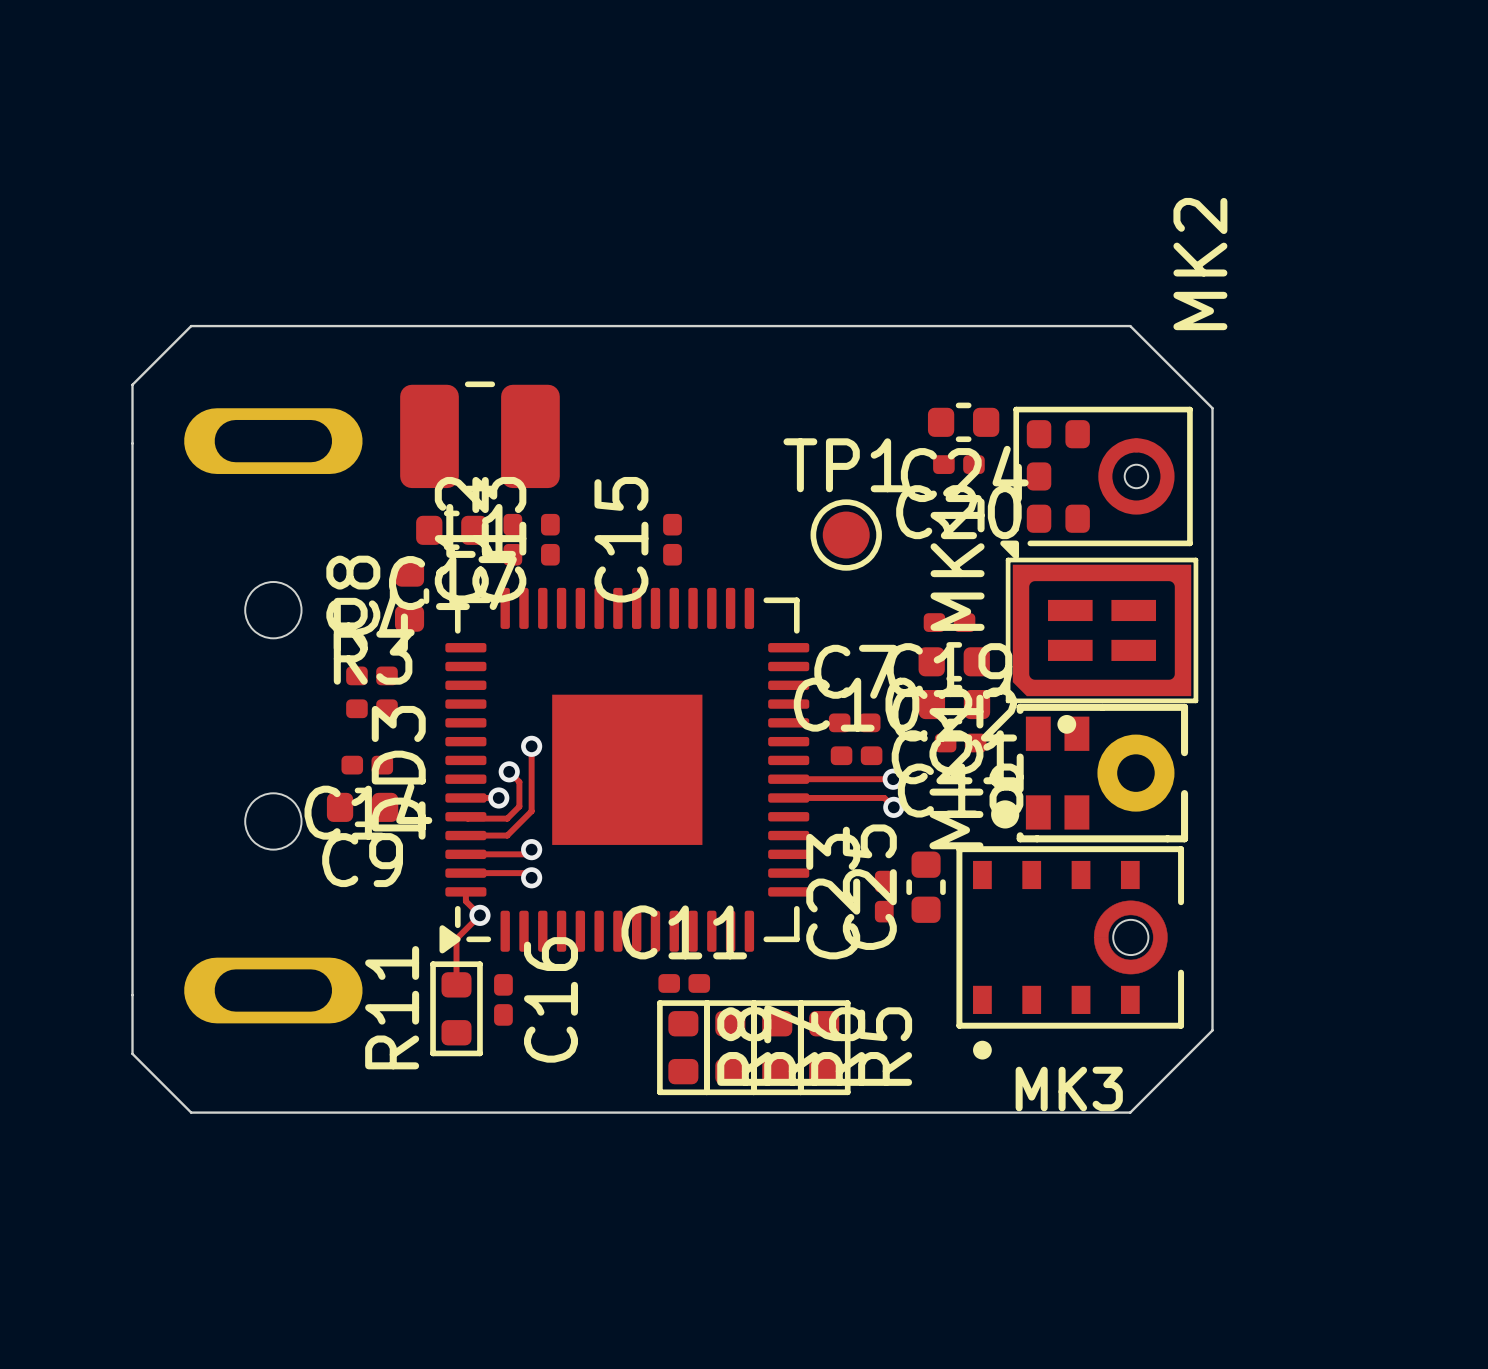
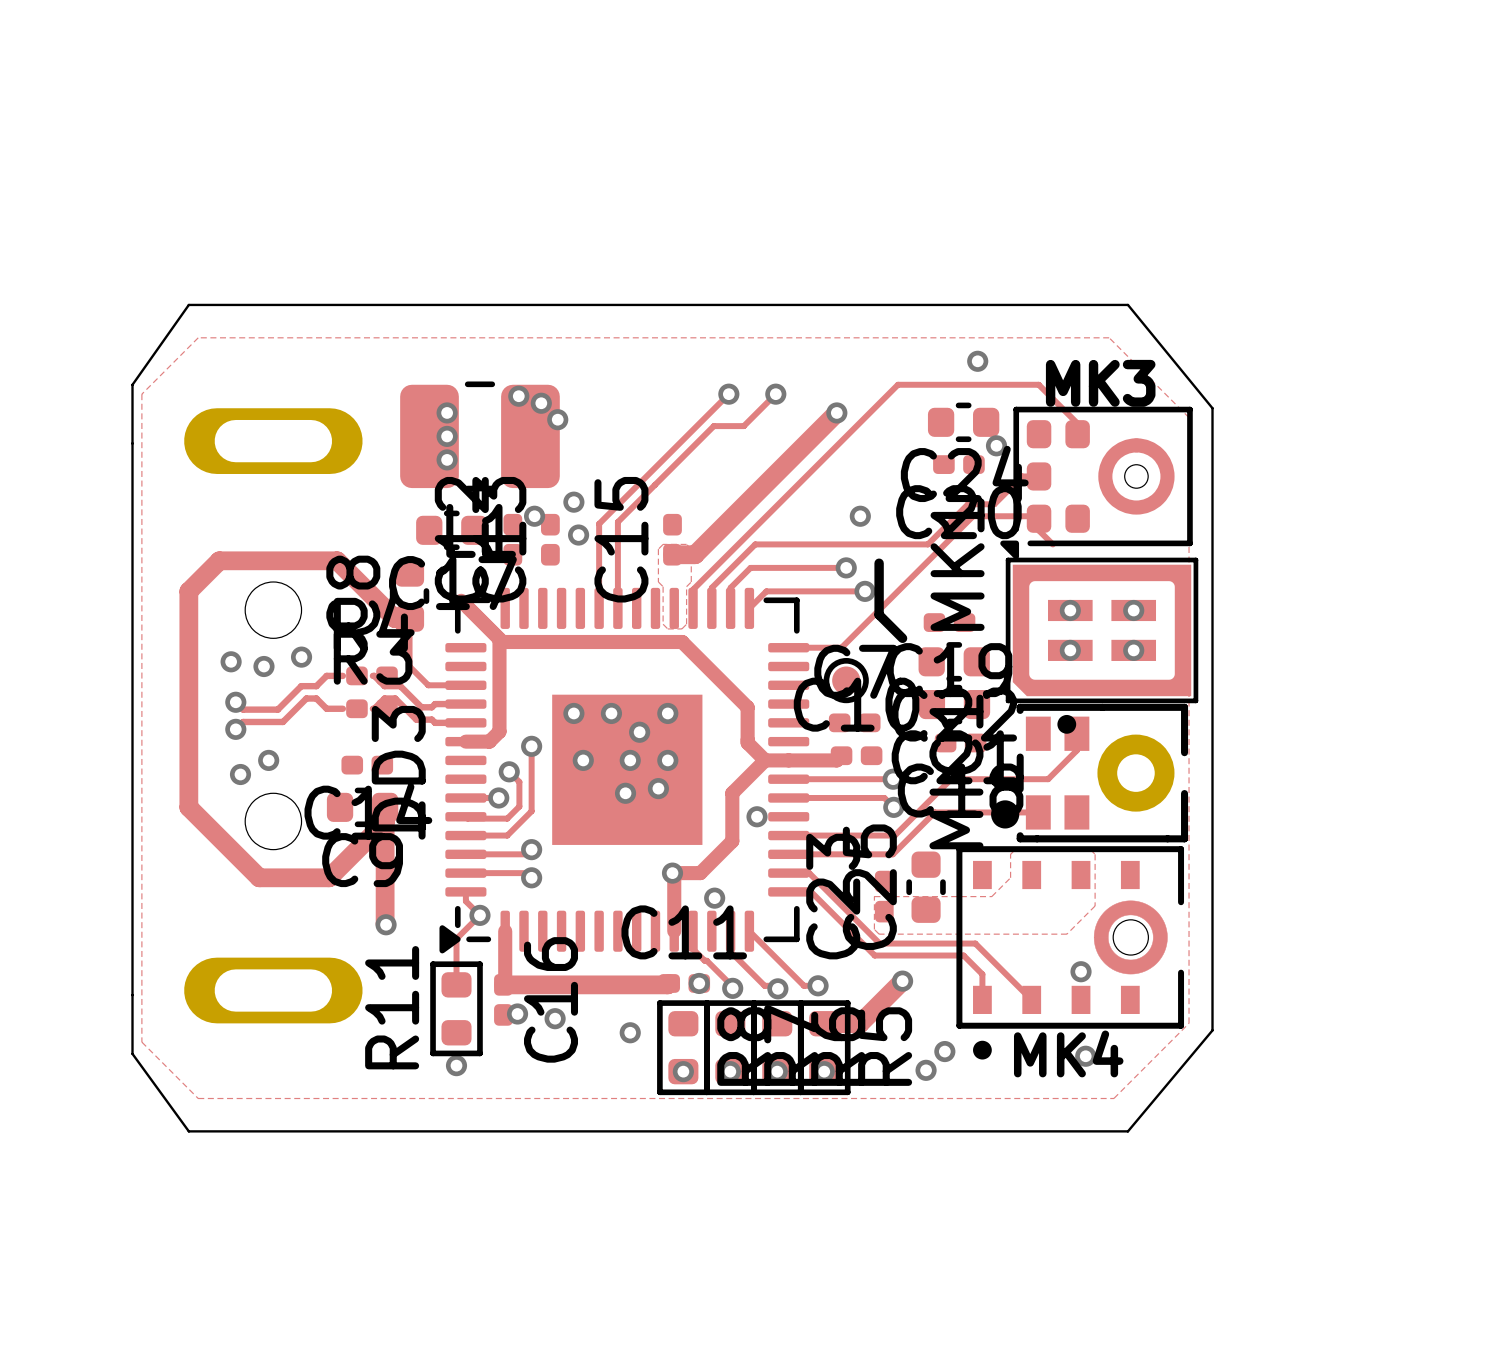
MK2 name: MK2 (1200, 264) -> MK3 (1100, 383)
zone outline: none -> (198, 337) (141, 394) (141, 1042) (198, 1098) (1113, 1098) (1189, 1023) (1189, 417) (1109, 337) (198, 337)
via: none -> (977, 361)
board edge: (132, 384) (191, 326) (1130, 326) (1212, 408) -> (132, 384) (188, 304) (1127, 304) (1212, 408)
track: none -> (728, 394) (599, 523) (599, 608)
via: none -> (728, 394)
track: none -> (775, 394) (743, 426) (713, 426) (617, 522) (617, 608)
via: none -> (775, 394)
via: none -> (518, 396)
via: none -> (541, 403)
via: none -> (447, 412)
track: none -> (836, 412) (695, 554) (672, 554)
via: none -> (836, 412)
via: none -> (557, 419)
track: none -> (1077, 434) (1077, 423) (1038, 384) (897, 384) (693, 589) (693, 608)
via: none -> (447, 436)
via: none -> (996, 445)
via: none -> (447, 459)
track: none -> (1039, 476) (1022, 476) (994, 504) (968, 504) (927, 544) (755, 544) (711, 587) (711, 608)
via: none -> (573, 502)
via: none -> (534, 516)
via: none -> (860, 516)
via: none -> (578, 535)
TP1: (846, 535) -> none
zone outline: none -> (663, 544) (658, 549) (658, 581) (663, 586) (663, 624) (667, 628) (681, 628) (686, 624) (686, 586) (691, 581) (691, 549) (686, 544) (663, 544)
track: none -> (1052, 544) (1039, 530) (1039, 518) (1036, 516) (973, 516) (841, 647) (788, 647)
line: none -> (879, 563) (879, 614) (902, 638)
track: none -> (846, 567) (750, 567) (730, 587) (730, 608)
via: none -> (846, 567)
track: none -> (865, 591) (766, 591) (749, 608)
via: none -> (865, 591)
track: none -> (461, 600) (502, 641) (682, 641) (747, 707) (747, 742) (765, 760)
via: none -> (1070, 610)
via: none -> (1133, 610)
track: none -> (499, 639) (499, 731) (489, 741) (465, 741)
via: none -> (1070, 650)
via: none -> (1133, 650)
via: none -> (301, 657)
via: none -> (231, 661)
via: none -> (263, 666)
track: none -> (342, 675) (326, 675) (316, 686) (301, 686) (277, 709) (243, 709) (235, 702)
track: none -> (372, 675) (384, 686) (400, 686) (421, 707) (431, 707) (435, 704) (465, 704)
part: none -> (846, 680)
track: none -> (465, 685) (428, 685) (409, 666) (409, 618) (394, 618) (337, 560) (219, 560) (188, 591) (188, 807) (259, 877) (329, 877) (385, 821)
via: none -> (235, 702)
track: none -> (342, 708) (326, 708) (316, 698) (306, 698) (282, 721) (243, 721) (235, 729)
track: none -> (372, 708) (384, 698) (395, 698) (416, 719) (431, 719) (435, 722) (465, 722)
via: none -> (573, 713)
via: none -> (611, 713)
via: none -> (667, 713)
via: none -> (235, 729)
via: none -> (639, 732)
track: none -> (1076, 733) (1076, 750) (1048, 779) (951, 779) (894, 835) (788, 835)
track: none -> (841, 755) (836, 760) (765, 760)
via: none -> (268, 760)
via: none -> (583, 760)
via: none -> (630, 760)
via: none -> (667, 760)
track: none -> (765, 760) (732, 793) (732, 841) (700, 873) (672, 873) (674, 874) (674, 931)
via: none -> (240, 774)
via: none -> (658, 788)
via: none -> (625, 793)
track: none -> (385, 807) (386, 924)
track: none -> (1038, 812) (934, 812) (892, 854) (788, 854)
via: none -> (757, 816)
zone outline: none -> (1015, 849) (1010, 854) (1010, 877) (991, 896) (874, 896) (874, 929) (879, 934) (1066, 934) (1095, 905) (1095, 854) (1090, 849) (1015, 849)
via: none -> (672, 873)
track: none -> (788, 873) (809, 873) (879, 943) (975, 943) (1031, 999)
track: none -> (788, 891) (811, 891) (874, 955) (963, 955) (982, 974) (982, 999)
via: none -> (714, 898)
via: none -> (386, 924)
track: none -> (505, 931) (505, 983) (503, 984) (669, 983)
track: none -> (693, 931) (693, 949) (732, 988)
track: none -> (730, 931) (730, 951) (764, 985) (774, 985) (777, 988)
track: none -> (749, 931) (803, 985) (818, 985)
via: none -> (1081, 971)
track: none -> (902, 981) (859, 1023) (824, 1023)
via: none -> (902, 981)
via: none -> (699, 983)
via: none -> (818, 985)
via: none -> (732, 988)
via: none -> (777, 988)
via: none -> (517, 1013)
via: none -> (555, 1018)
board edge: (1212, 1030) (1130, 1112) (191, 1112) (132, 1053) -> (1212, 1030) (1127, 1131) (188, 1131) (132, 1053)
via: none -> (630, 1032)
via: none -> (944, 1051)
via: none -> (1085, 1056)
via: none -> (456, 1065)
via: none -> (926, 1070)
via: none -> (683, 1071)
via: none -> (730, 1071)
via: none -> (777, 1071)
via: none -> (824, 1071)
MK3 name: MK3 (1069, 1089) -> MK4 (1068, 1053)

